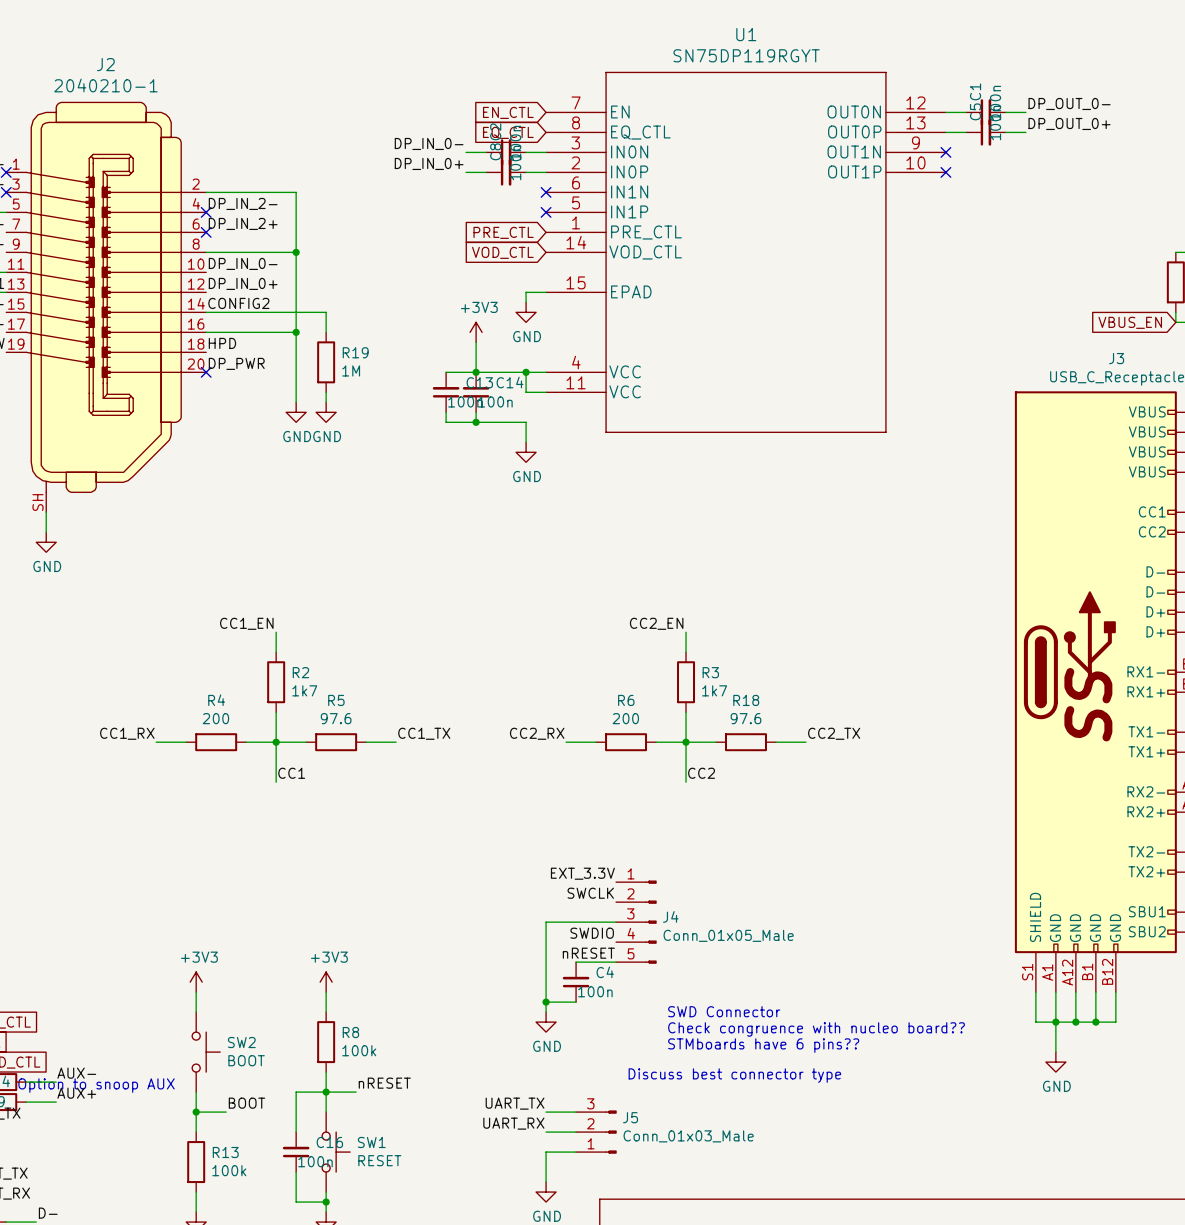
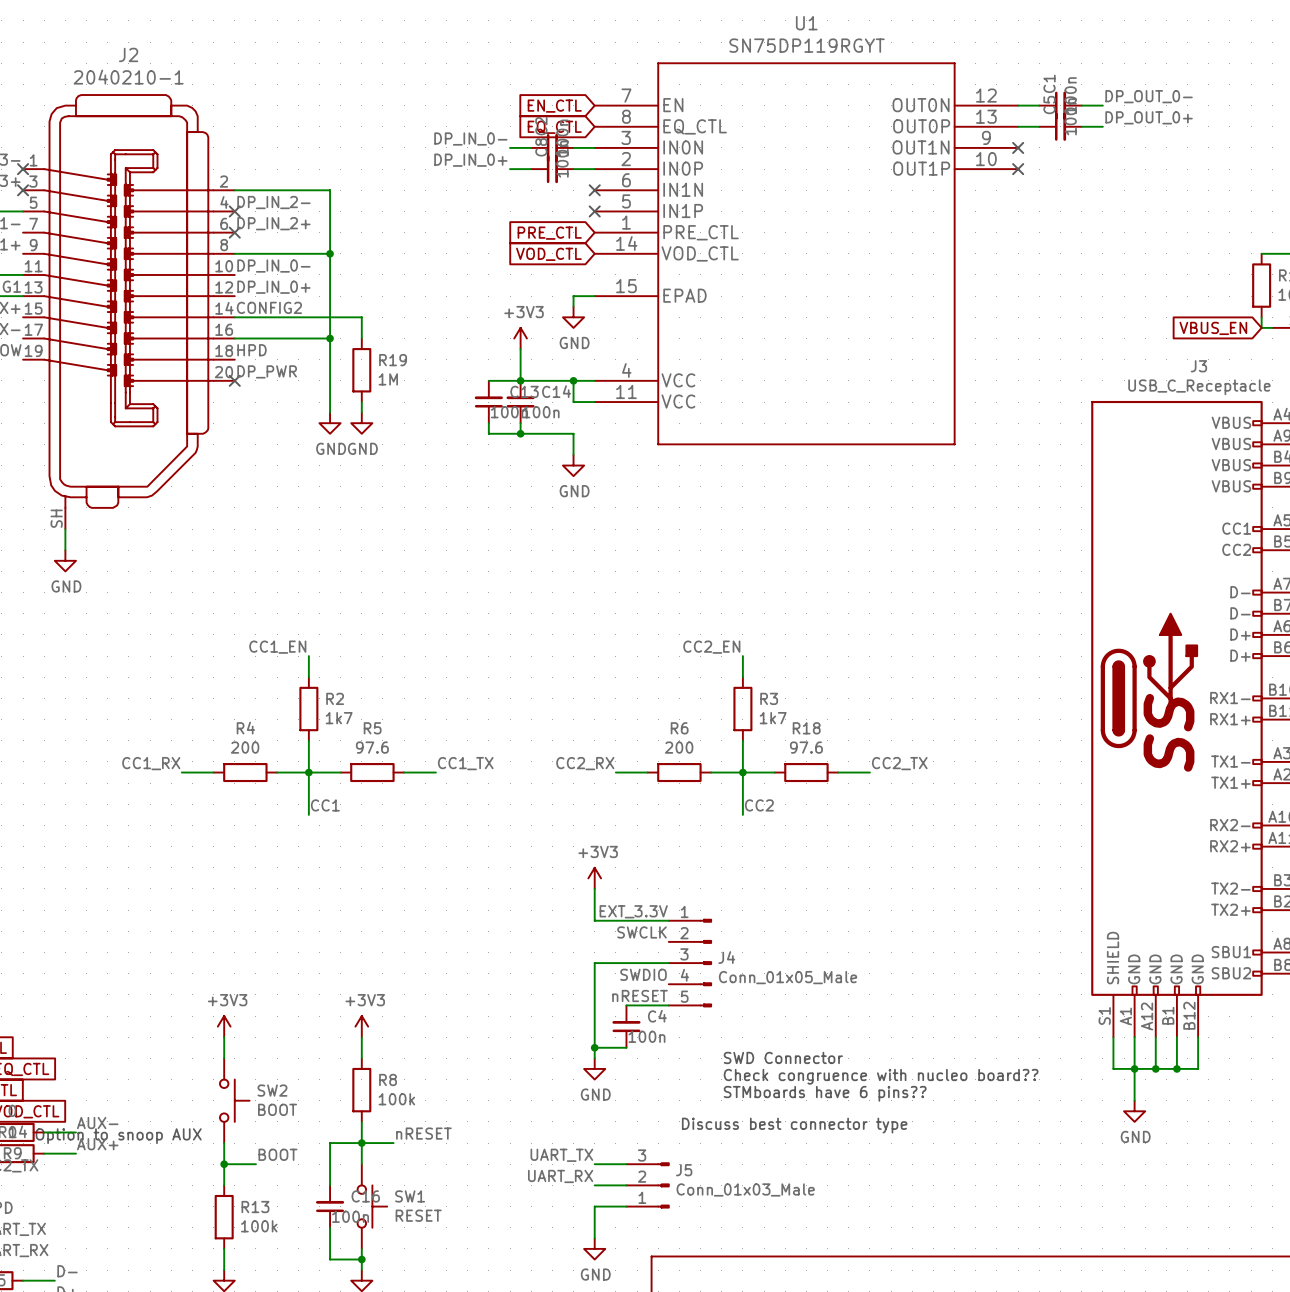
power symbol: none -> +3V3 (594, 878)
wire: none -> (594, 888) (594, 920) (668, 920)

